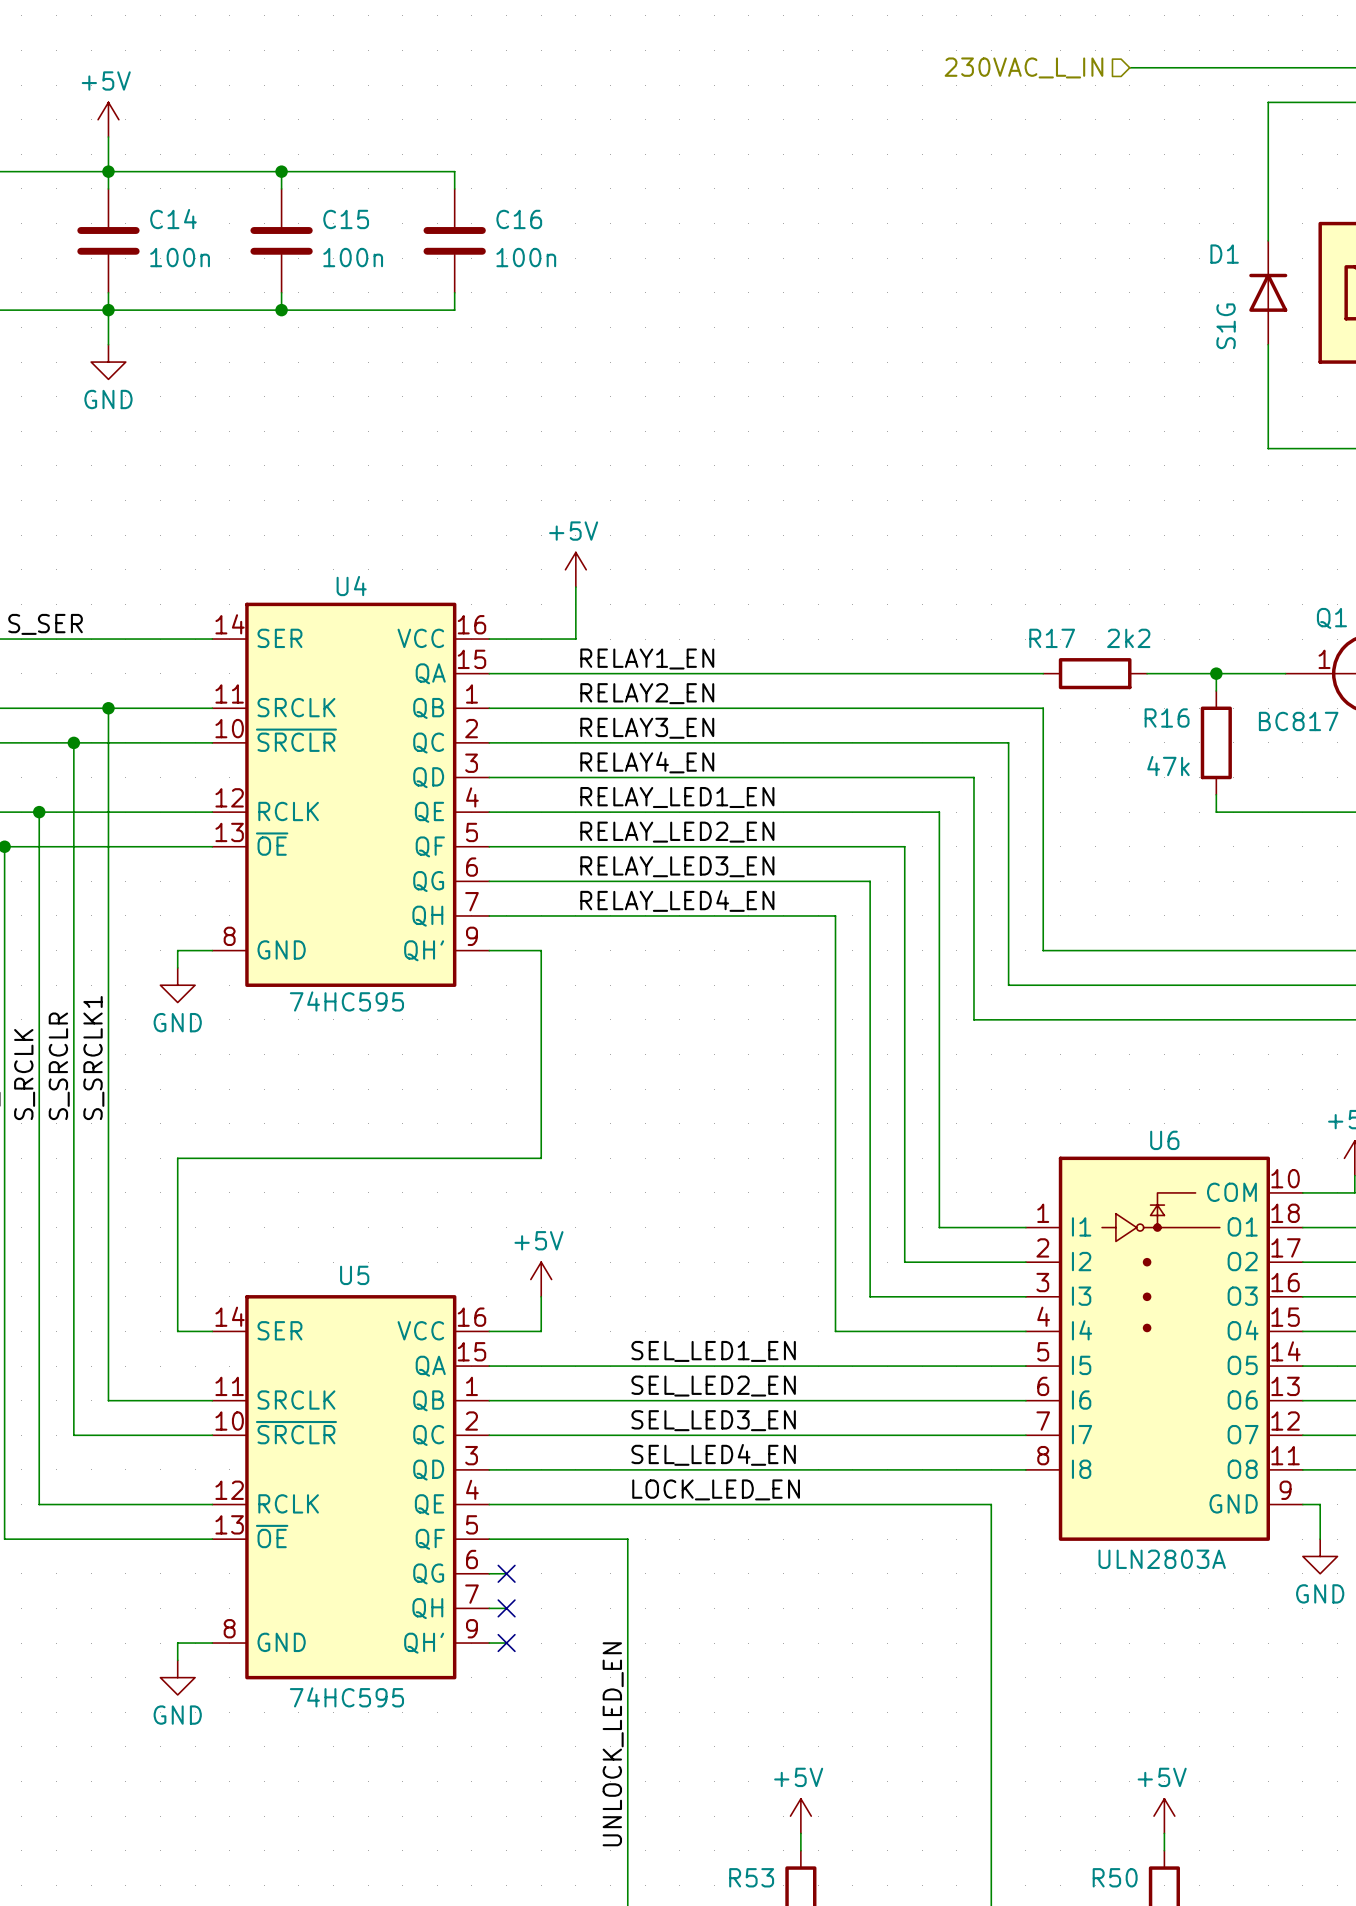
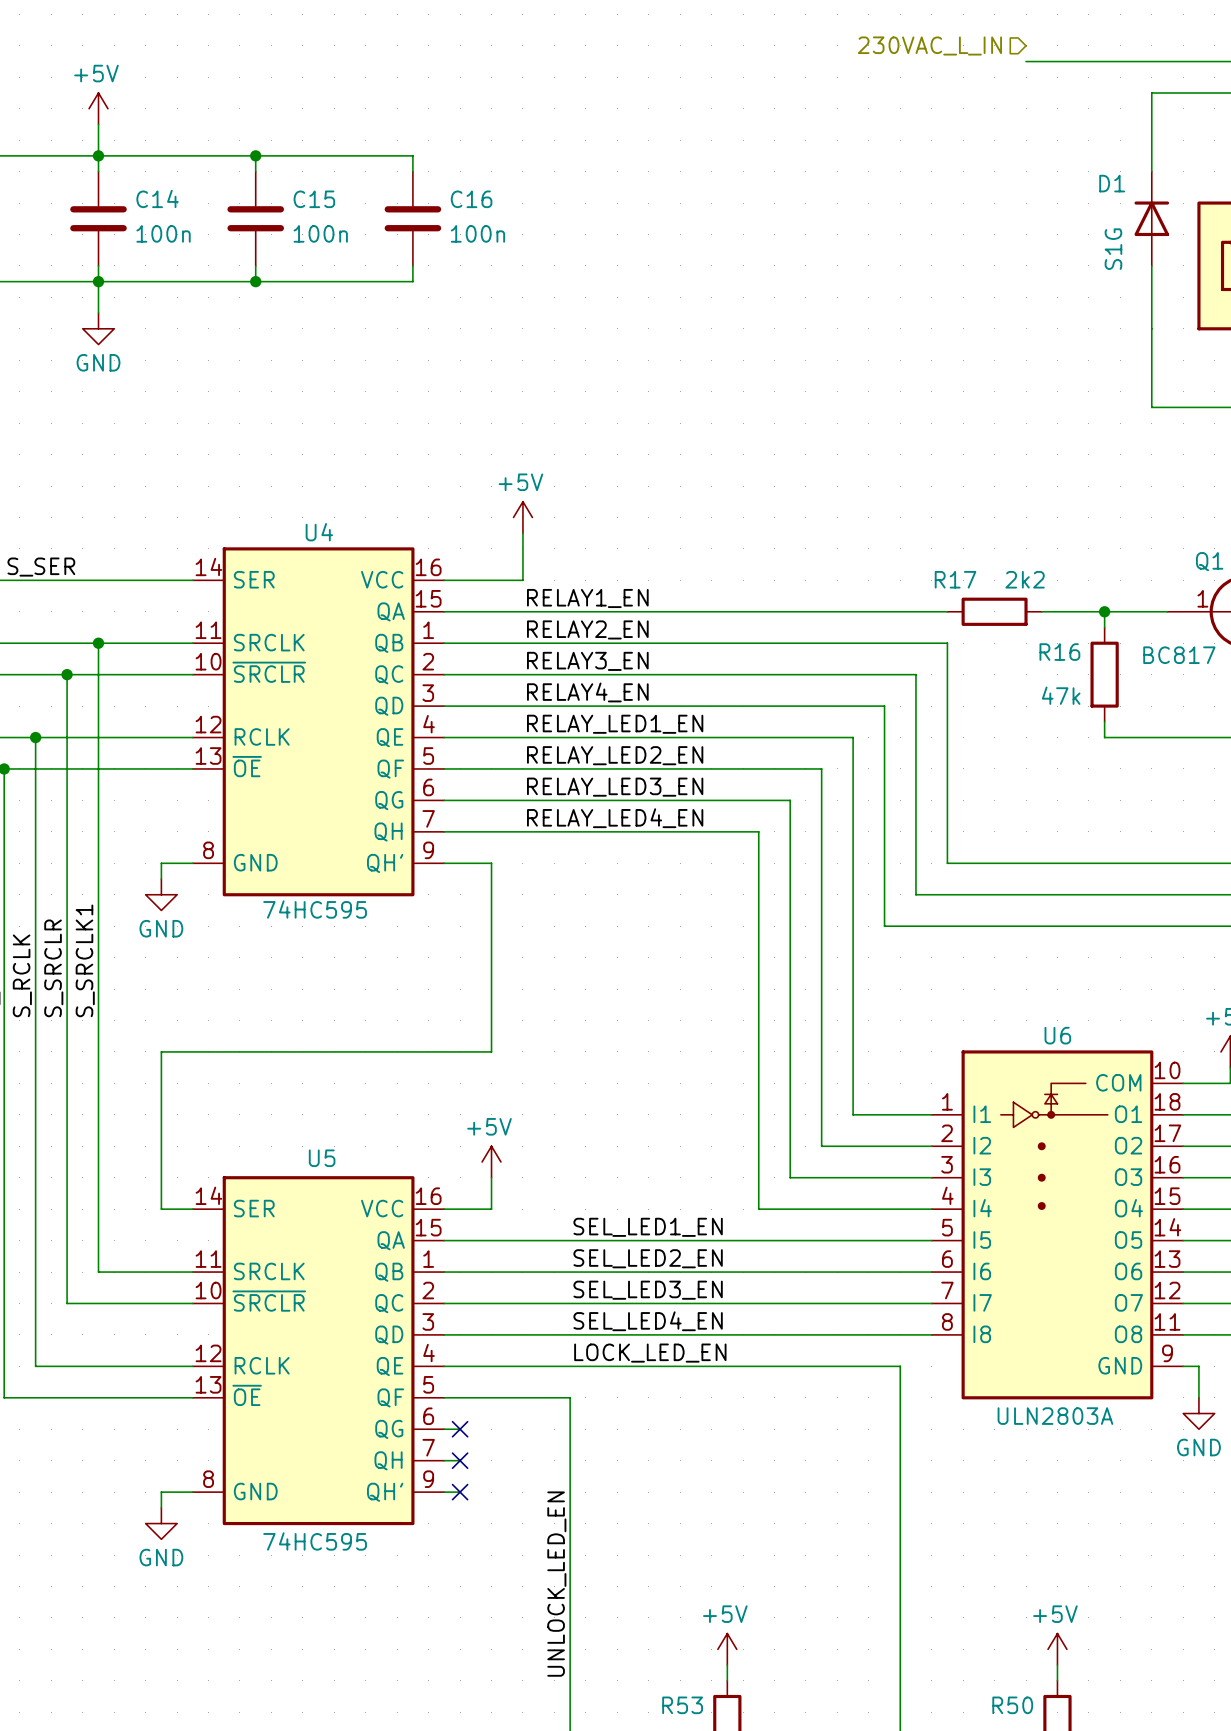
hierarchical label position: 230VAC_L_IN (1024, 67) -> 230VAC_L_IN (929, 45)
D1 position: (1268, 292) -> (1151, 218)

